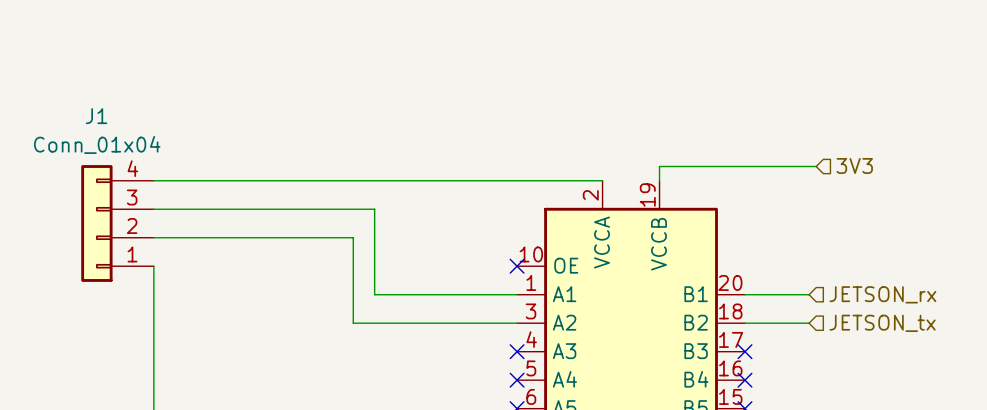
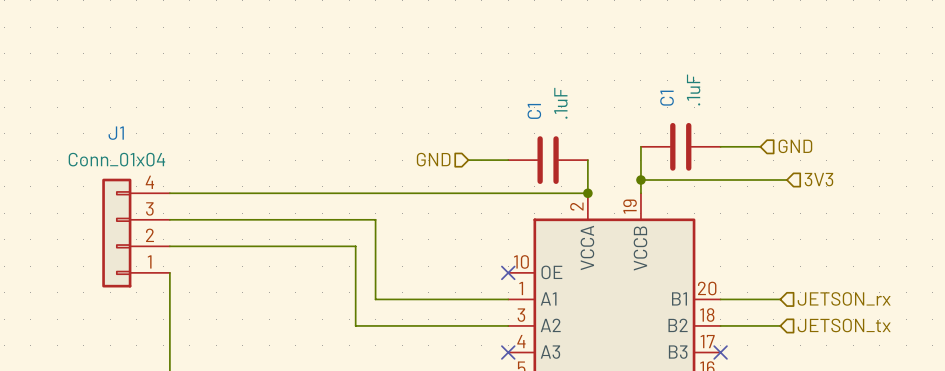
wire: none -> (640, 146) (640, 180)
C1: none -> .1uF (680, 146)
wire: none -> (720, 146) (760, 146)
hierarchical label: none -> GND (795, 146)
hierarchical label: none -> GND (433, 159)
wire: none -> (468, 160) (508, 160)
C1: none -> .1uF (548, 160)
wire: none -> (587, 160) (587, 193)
junction: none -> (640, 180)
junction: none -> (587, 193)

